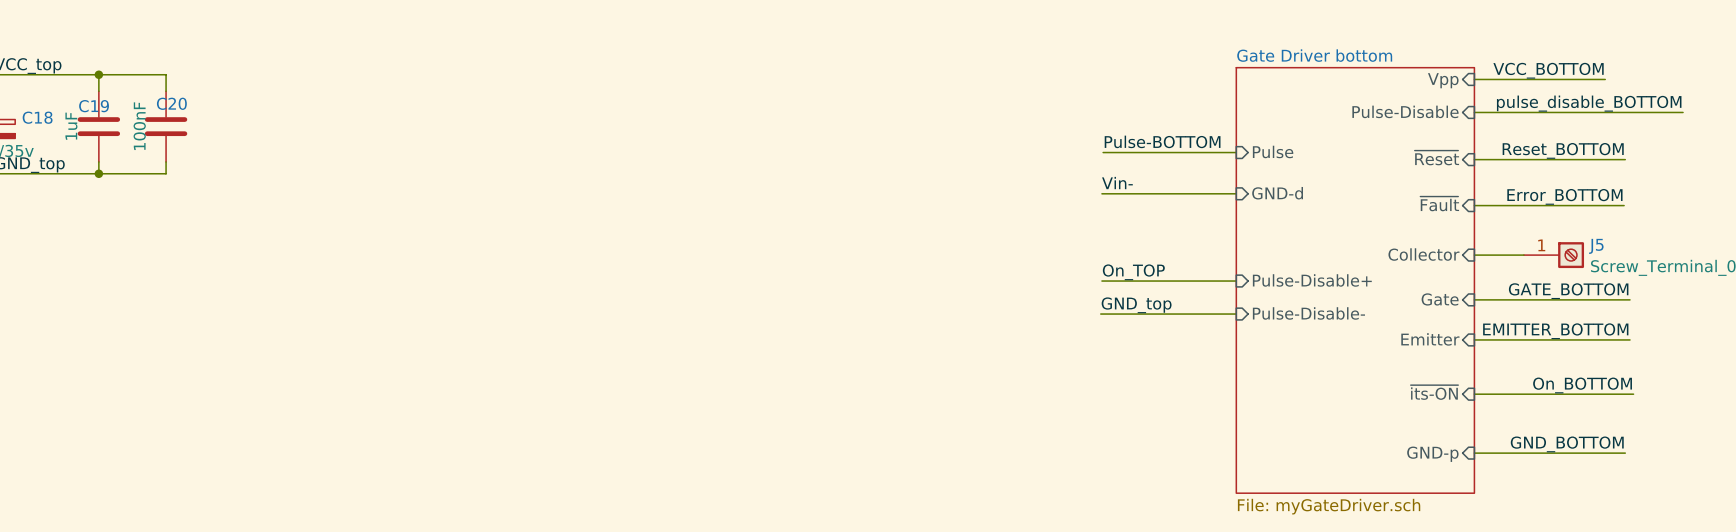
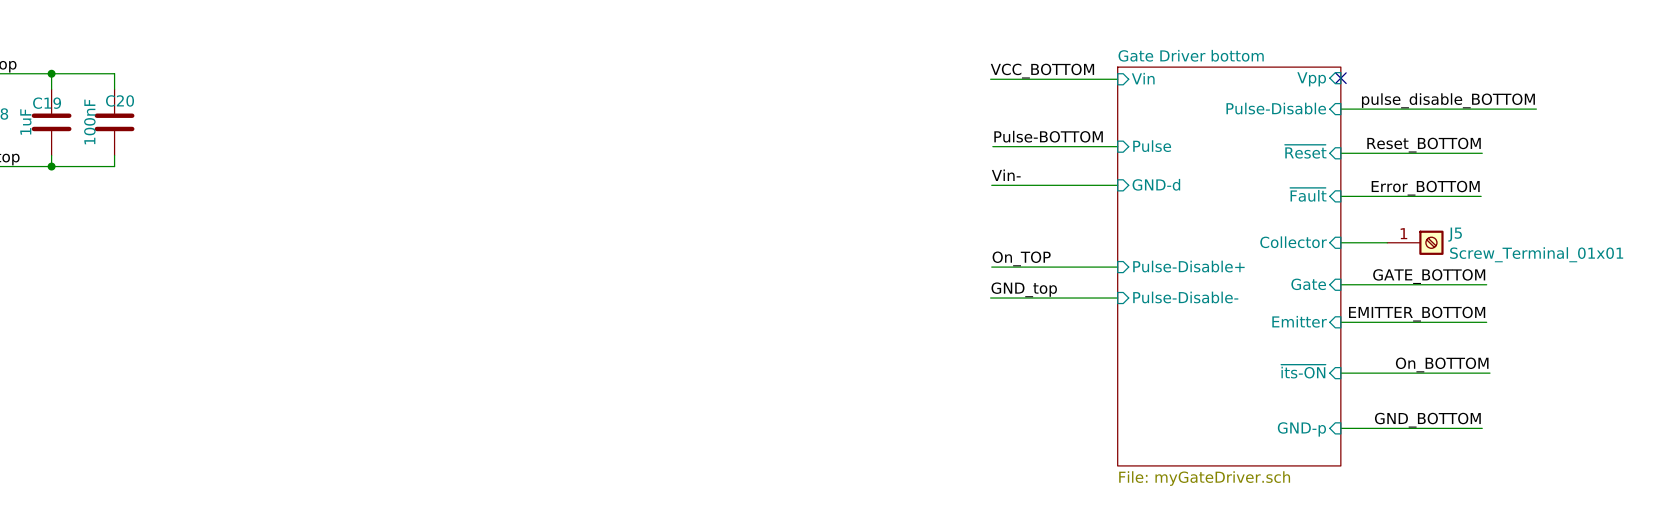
label: VCC_BOTTOM (1548, 70) -> none
label: none -> VCC_BOTTOM (1042, 71)
sheet pin: none -> Vin (1143, 78)
wire: (1474, 79) (1605, 79) -> none
no-connect mark: none -> (1340, 78)
wire: none -> (990, 79) (1117, 79)

